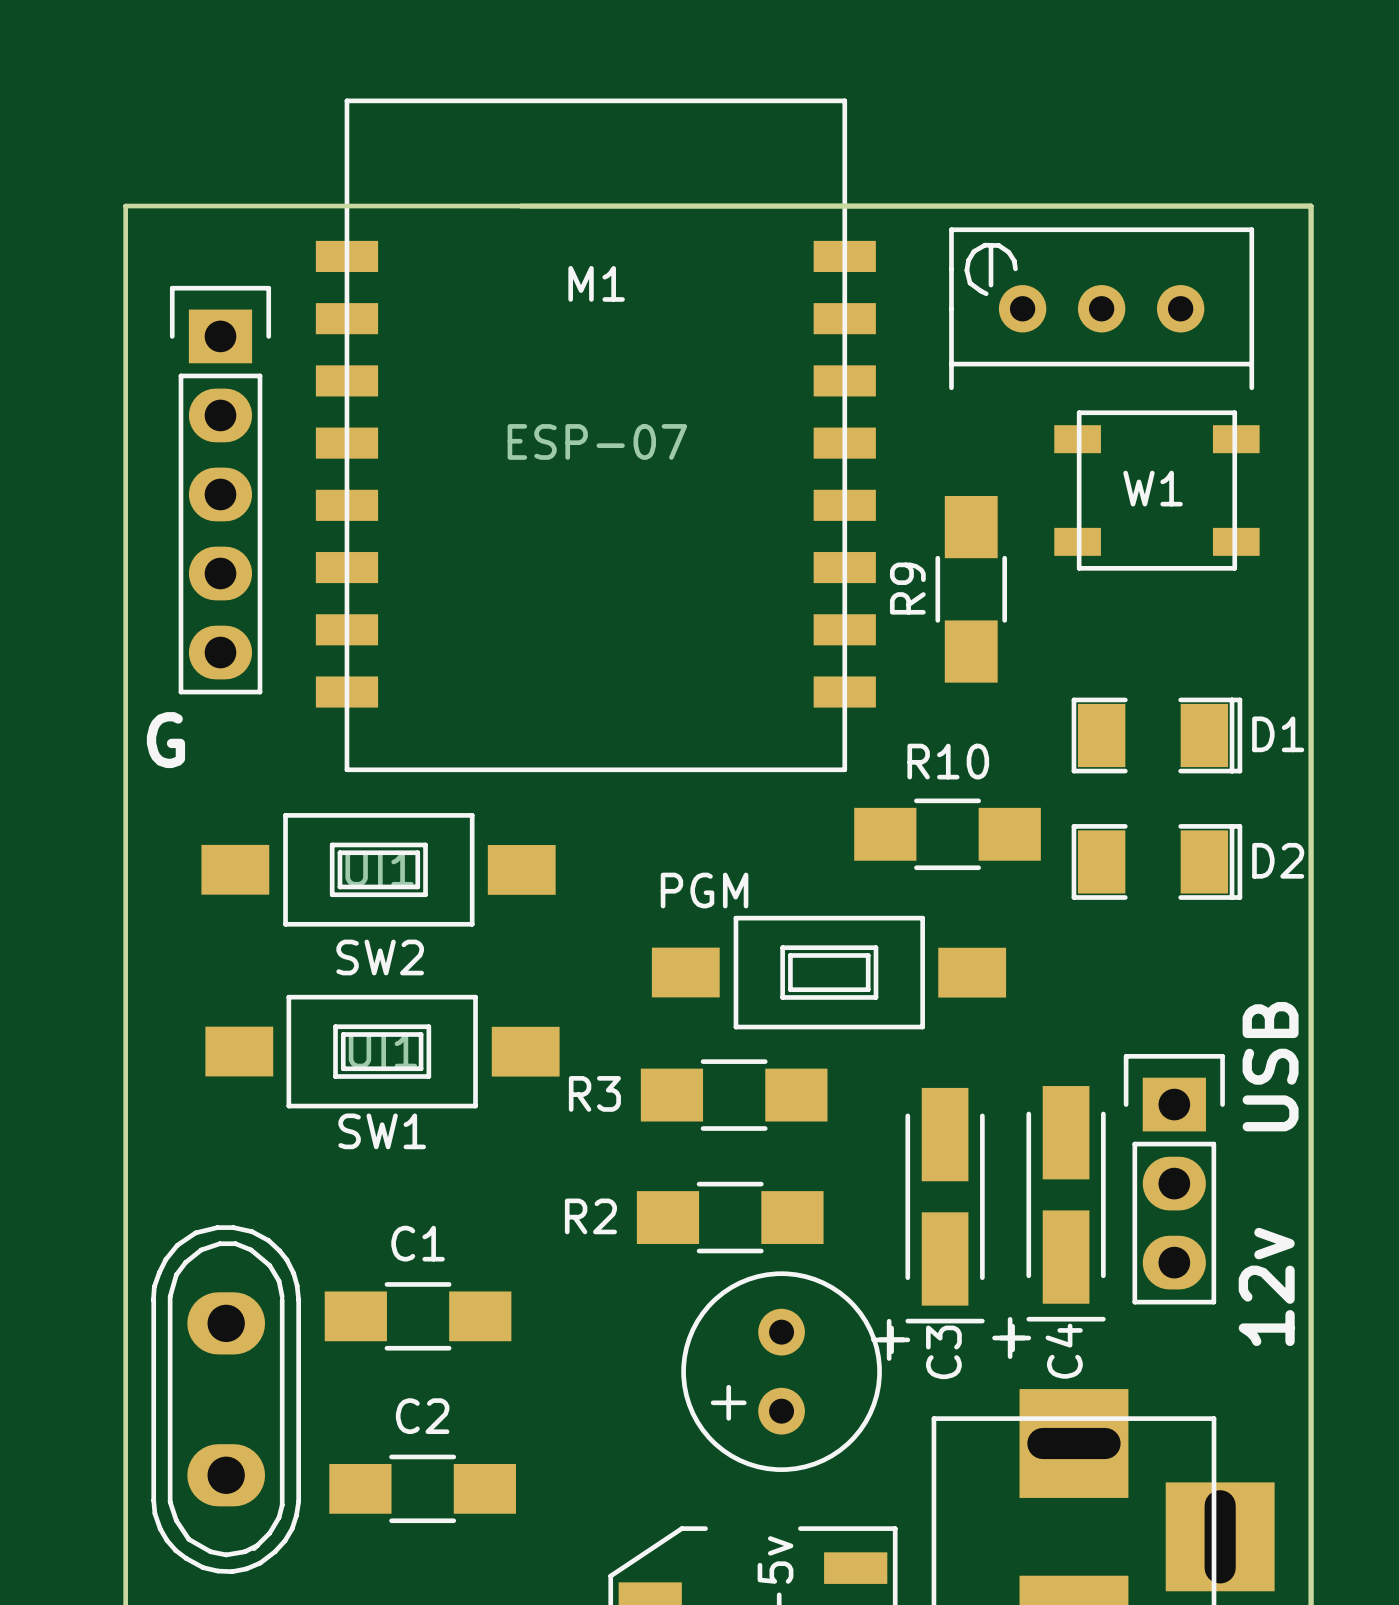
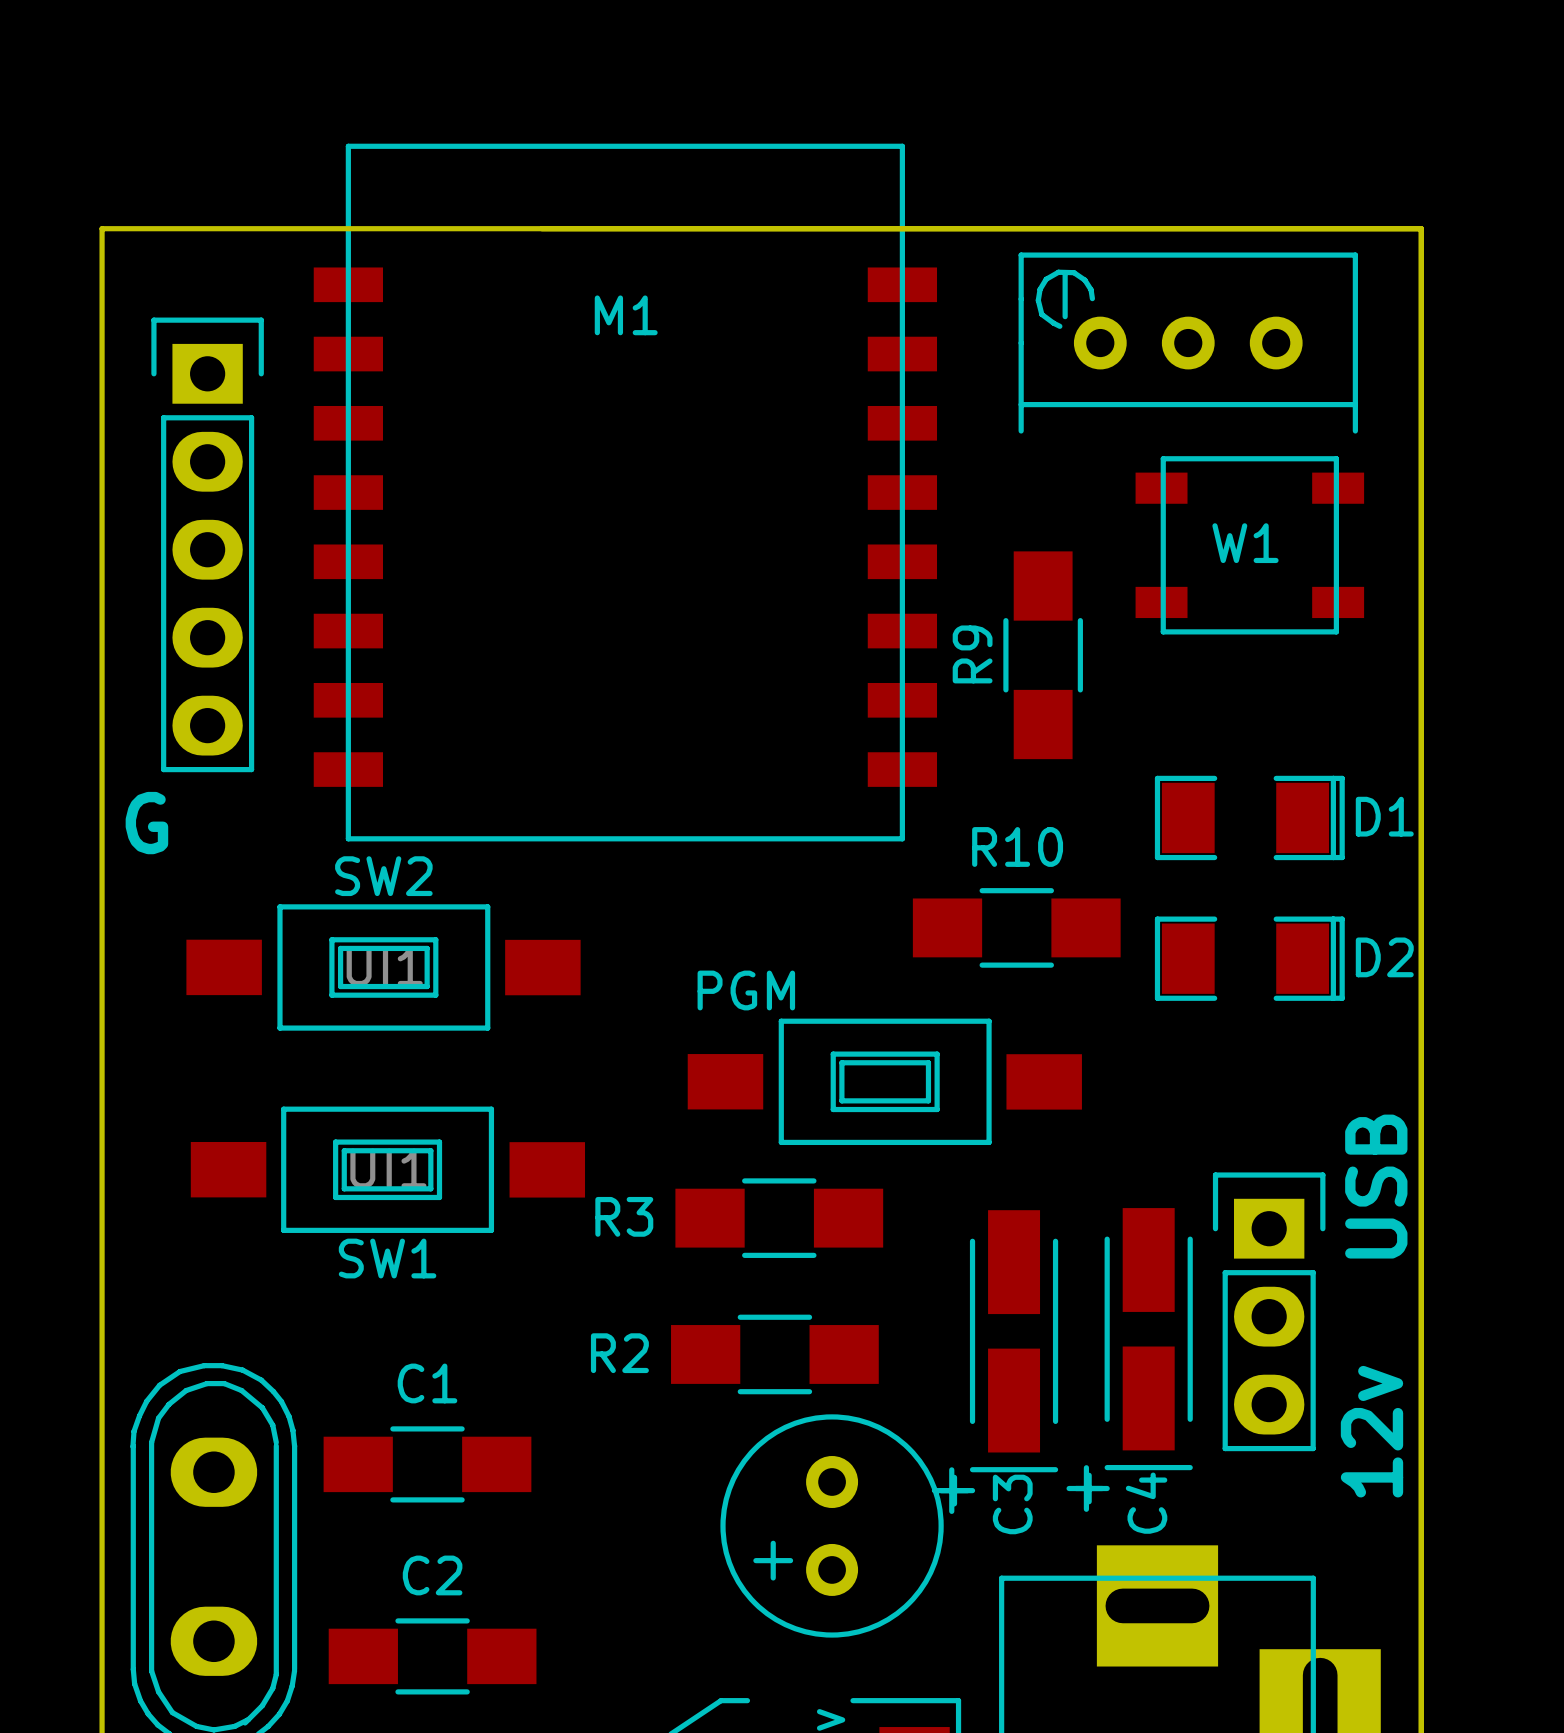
M1 footprint: [315, 98, 876, 773] -> [313, 143, 938, 842]
M1 value: ESP-07 (597, 441) -> none
SW2 name position: SW2 (380, 957) -> SW2 (383, 876)

